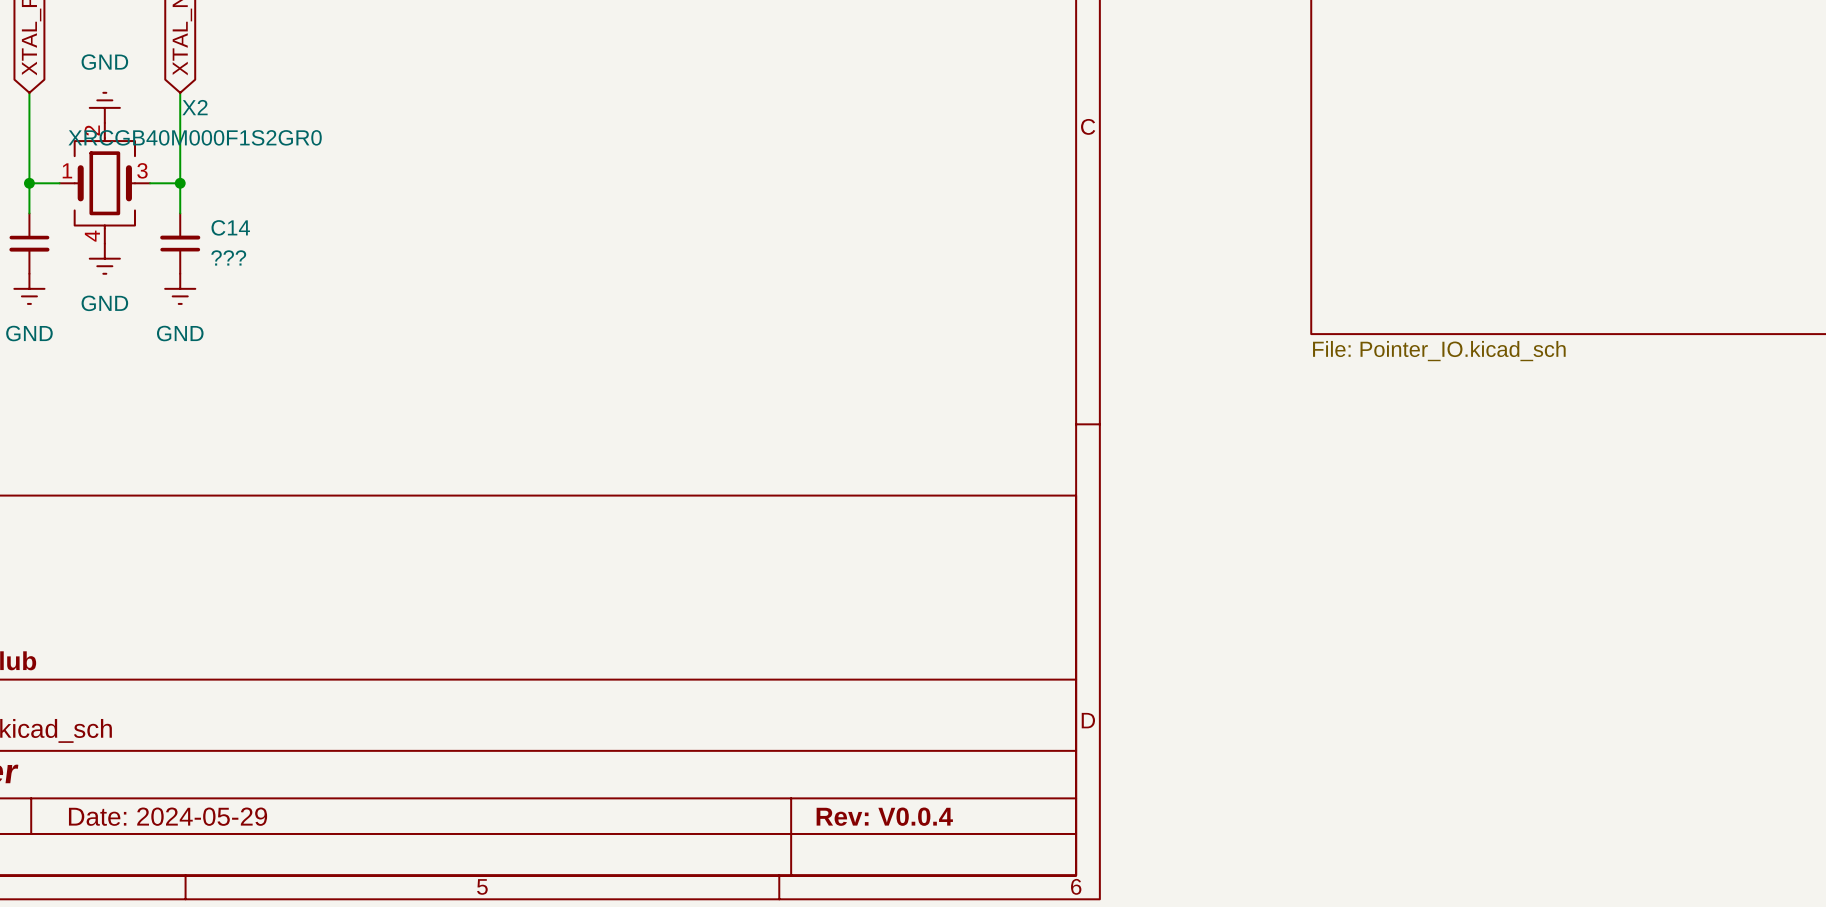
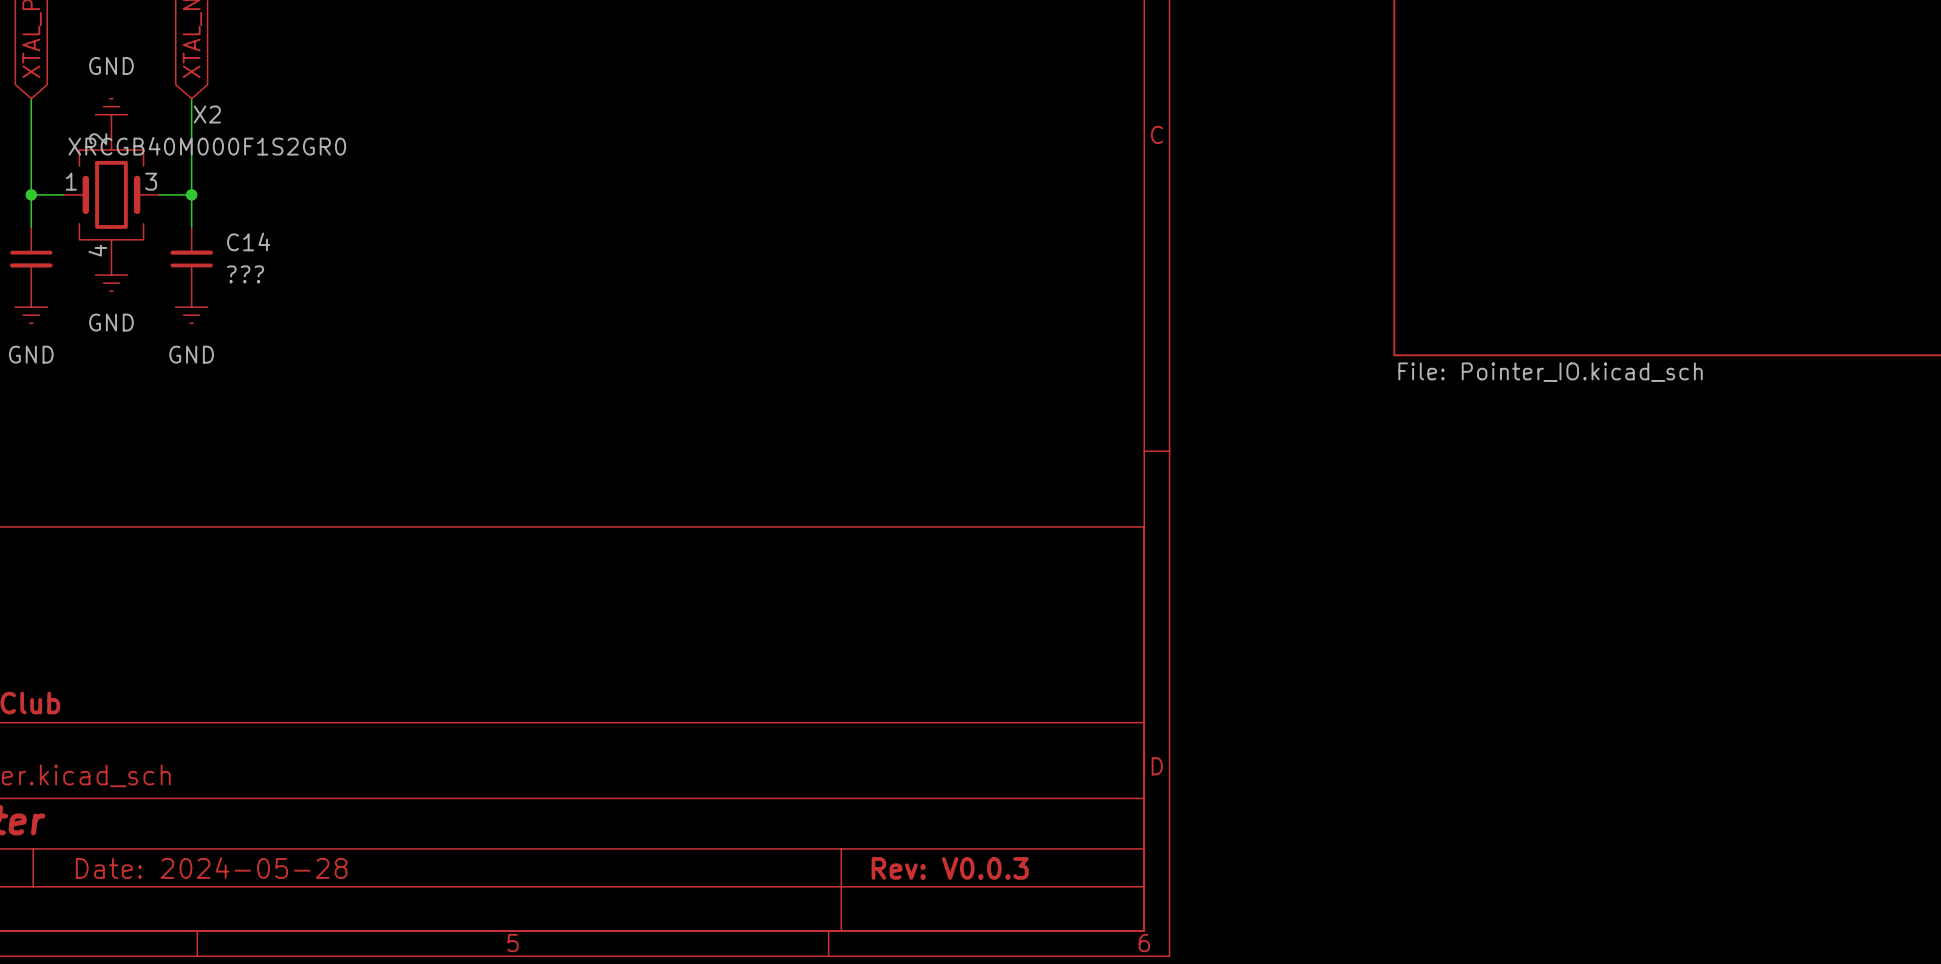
title block: Date: 2024-05-29 (168, 816) -> Date: 2024-05-28 (211, 867)
title block: Rev: V0.0.4 (884, 816) -> Rev: V0.0.3 (950, 868)

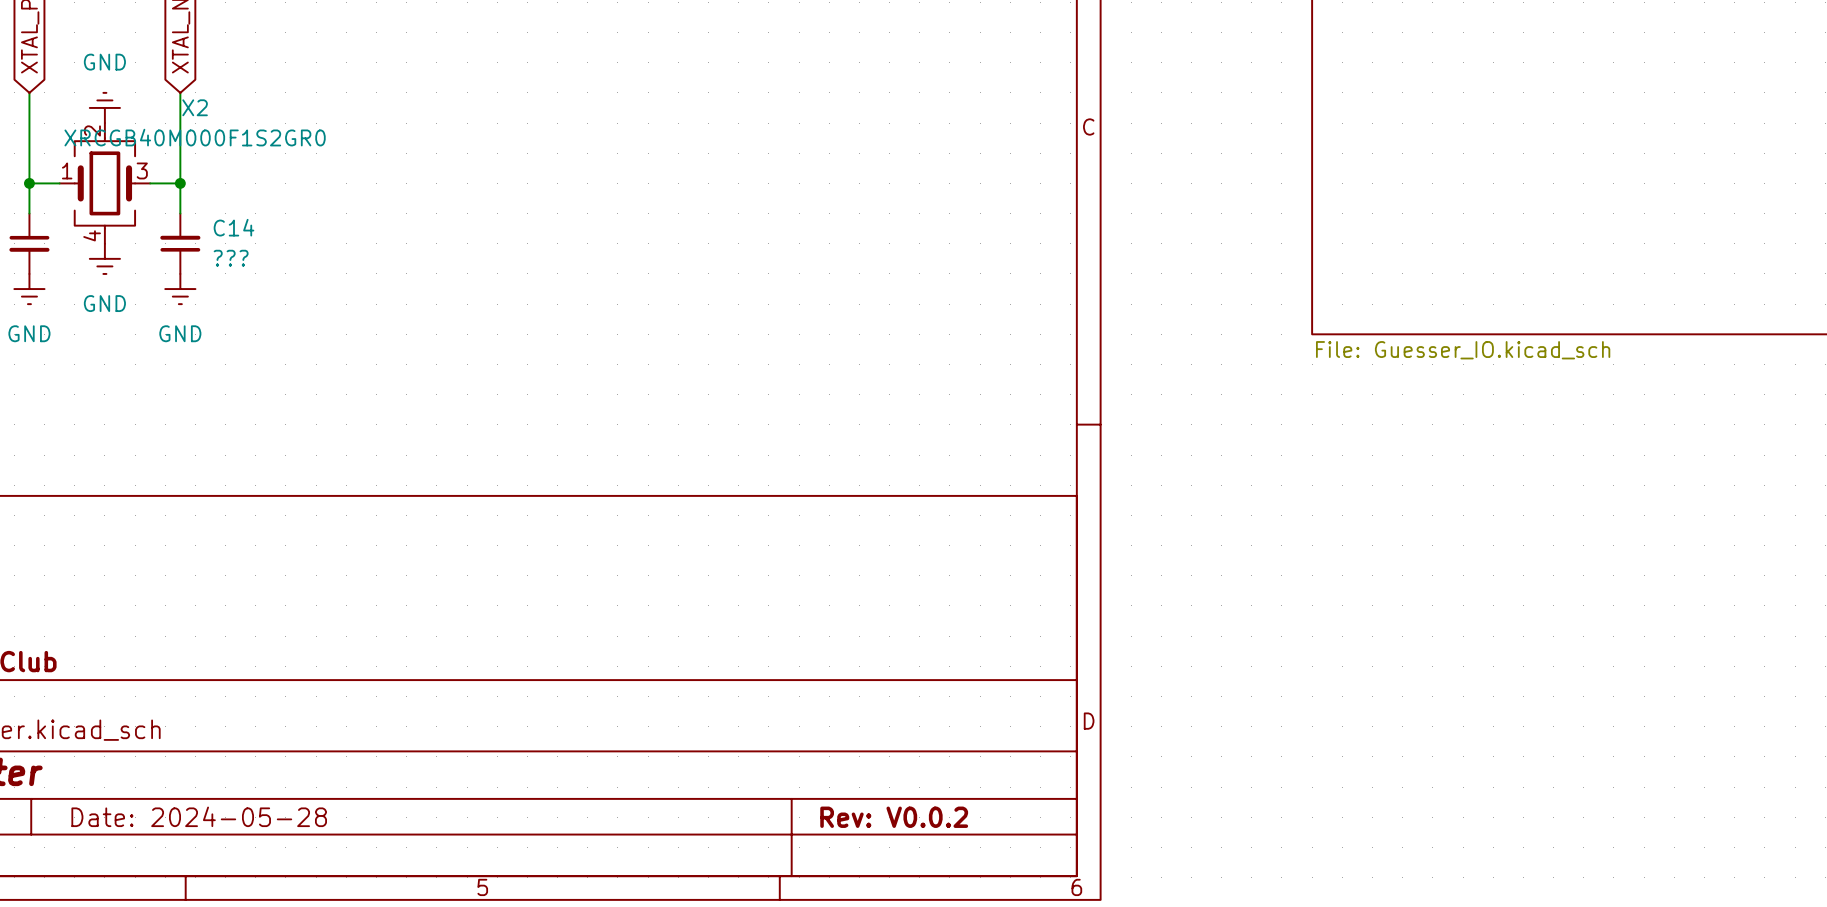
sheet value: File: Pointer_IO.kicad_sch (1550, 372) -> File: Guesser_IO.kicad_sch (1463, 350)
title block: Rev: V0.0.3 (950, 868) -> Rev: V0.0.2 (894, 817)

